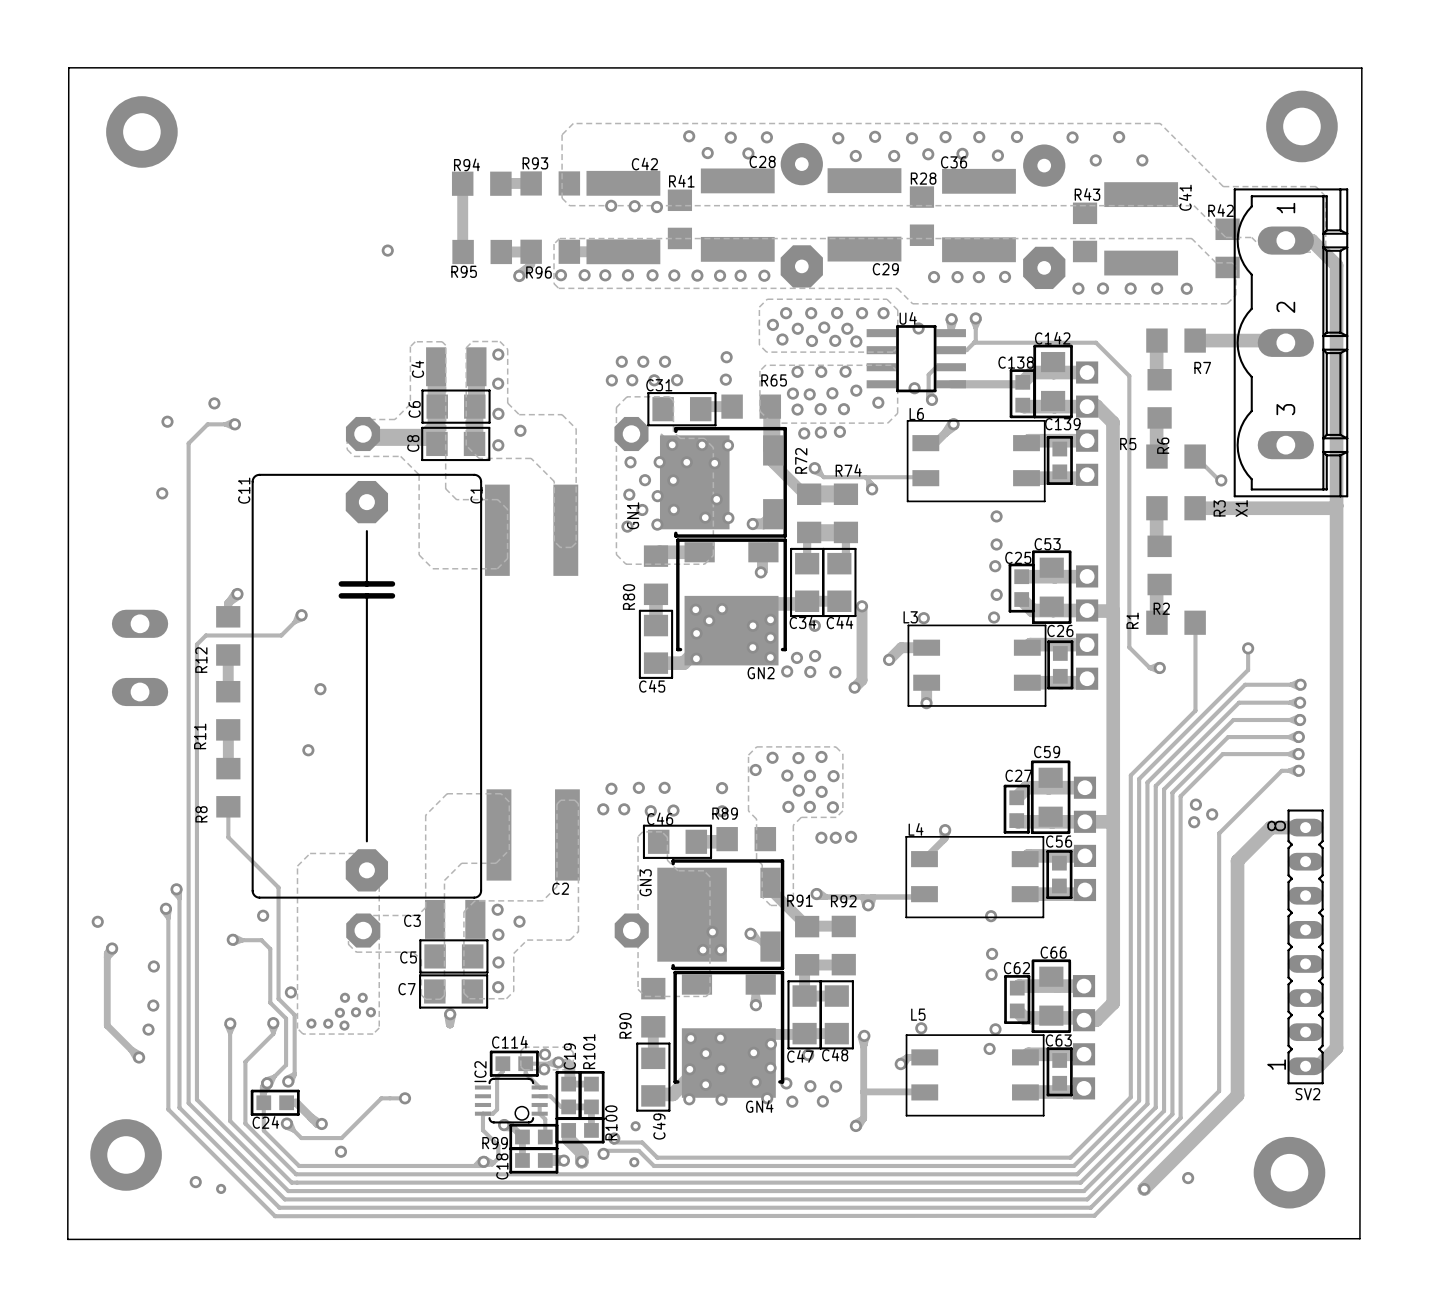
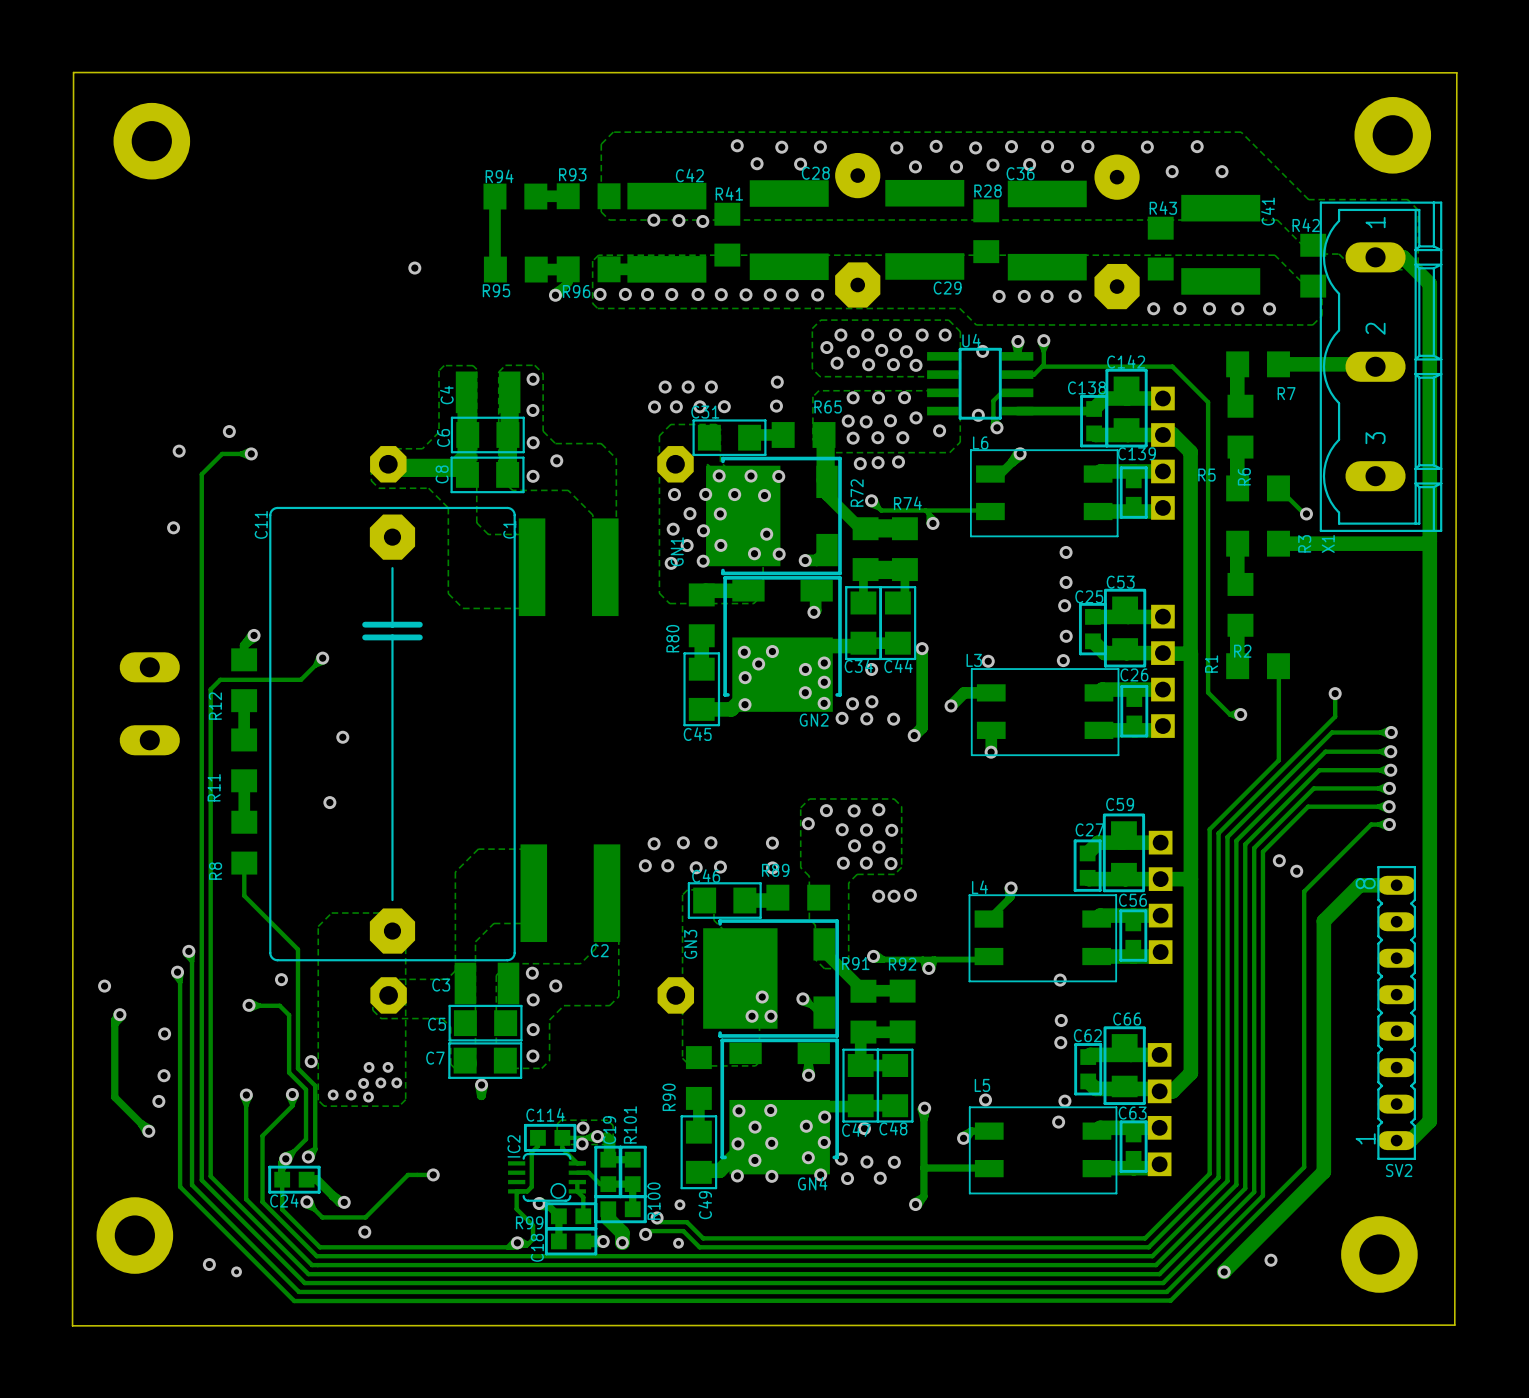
via: (1194, 822) -> none

